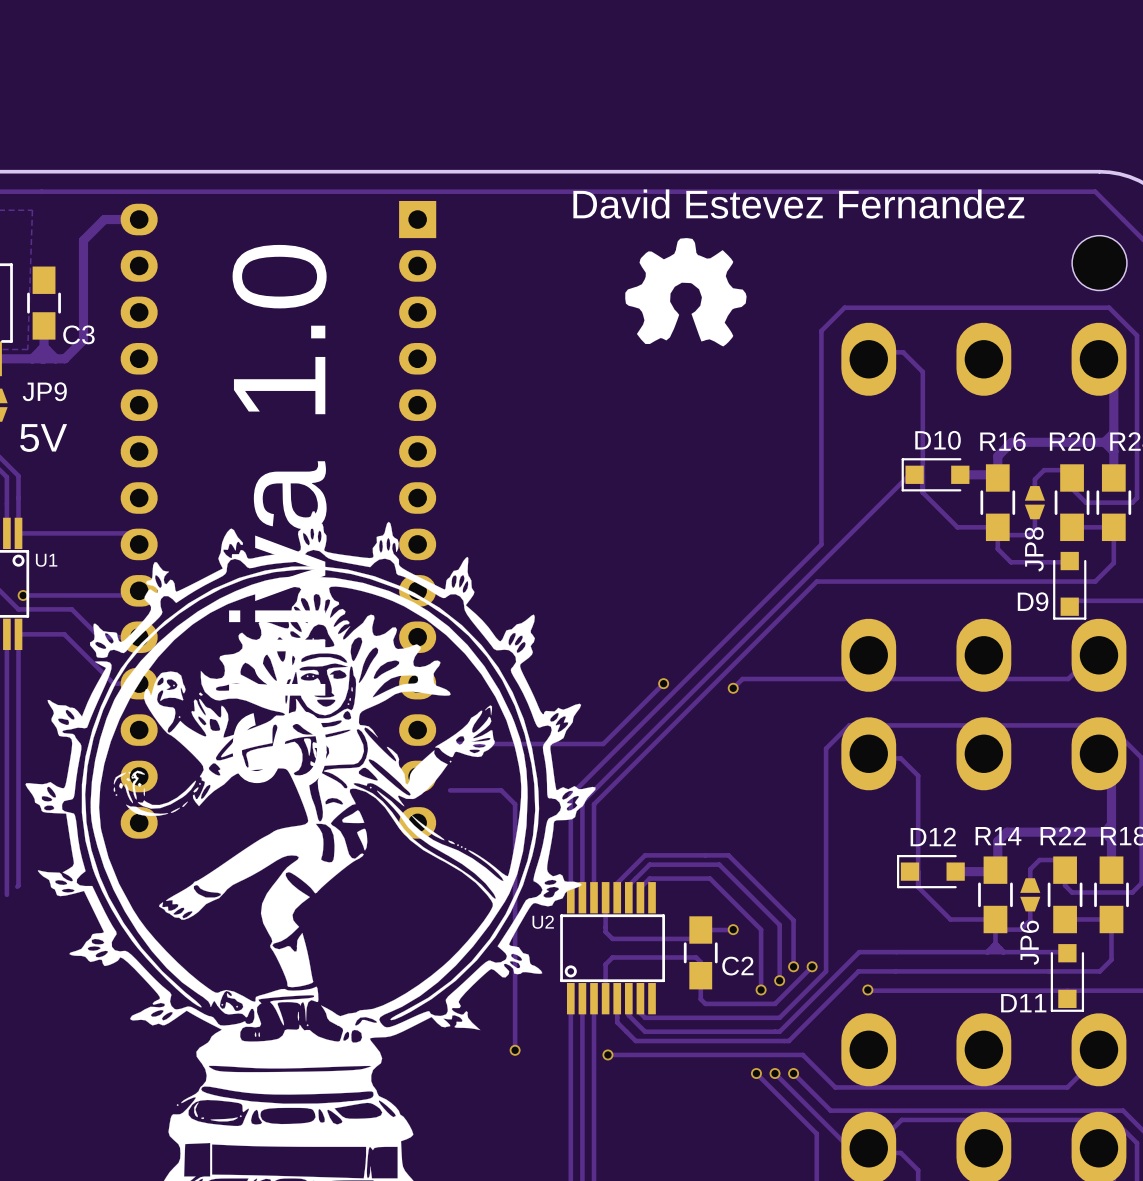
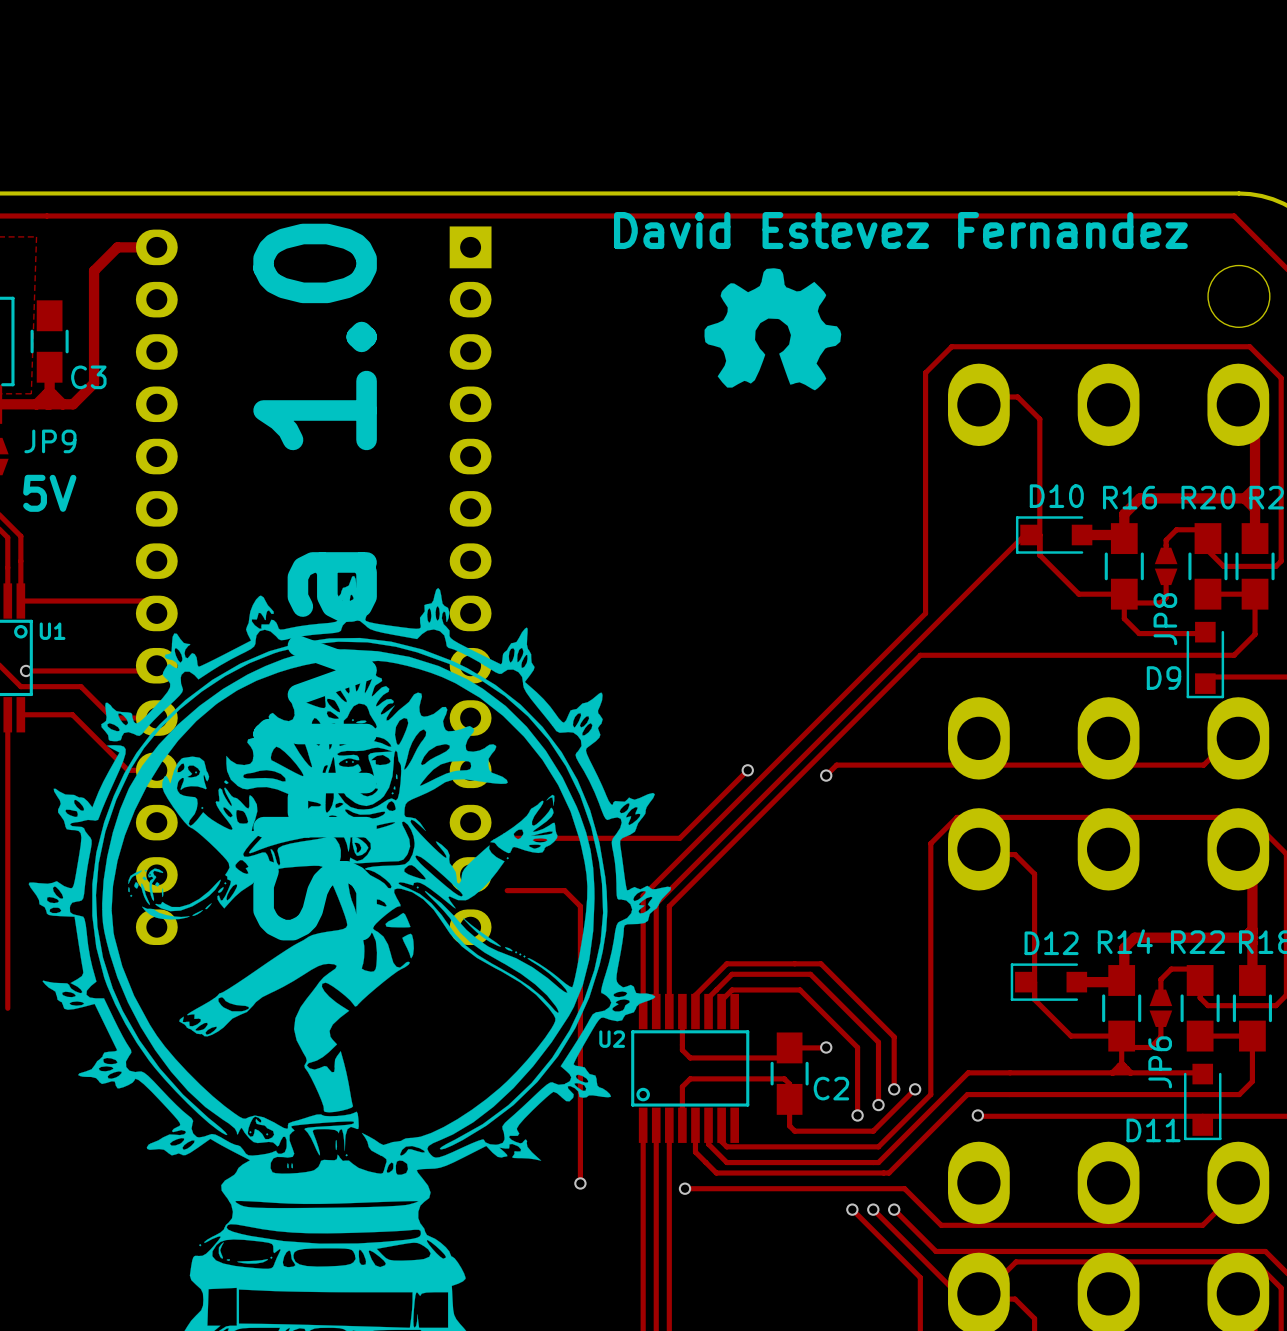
track: (18, 634) (17, 886) -> none

